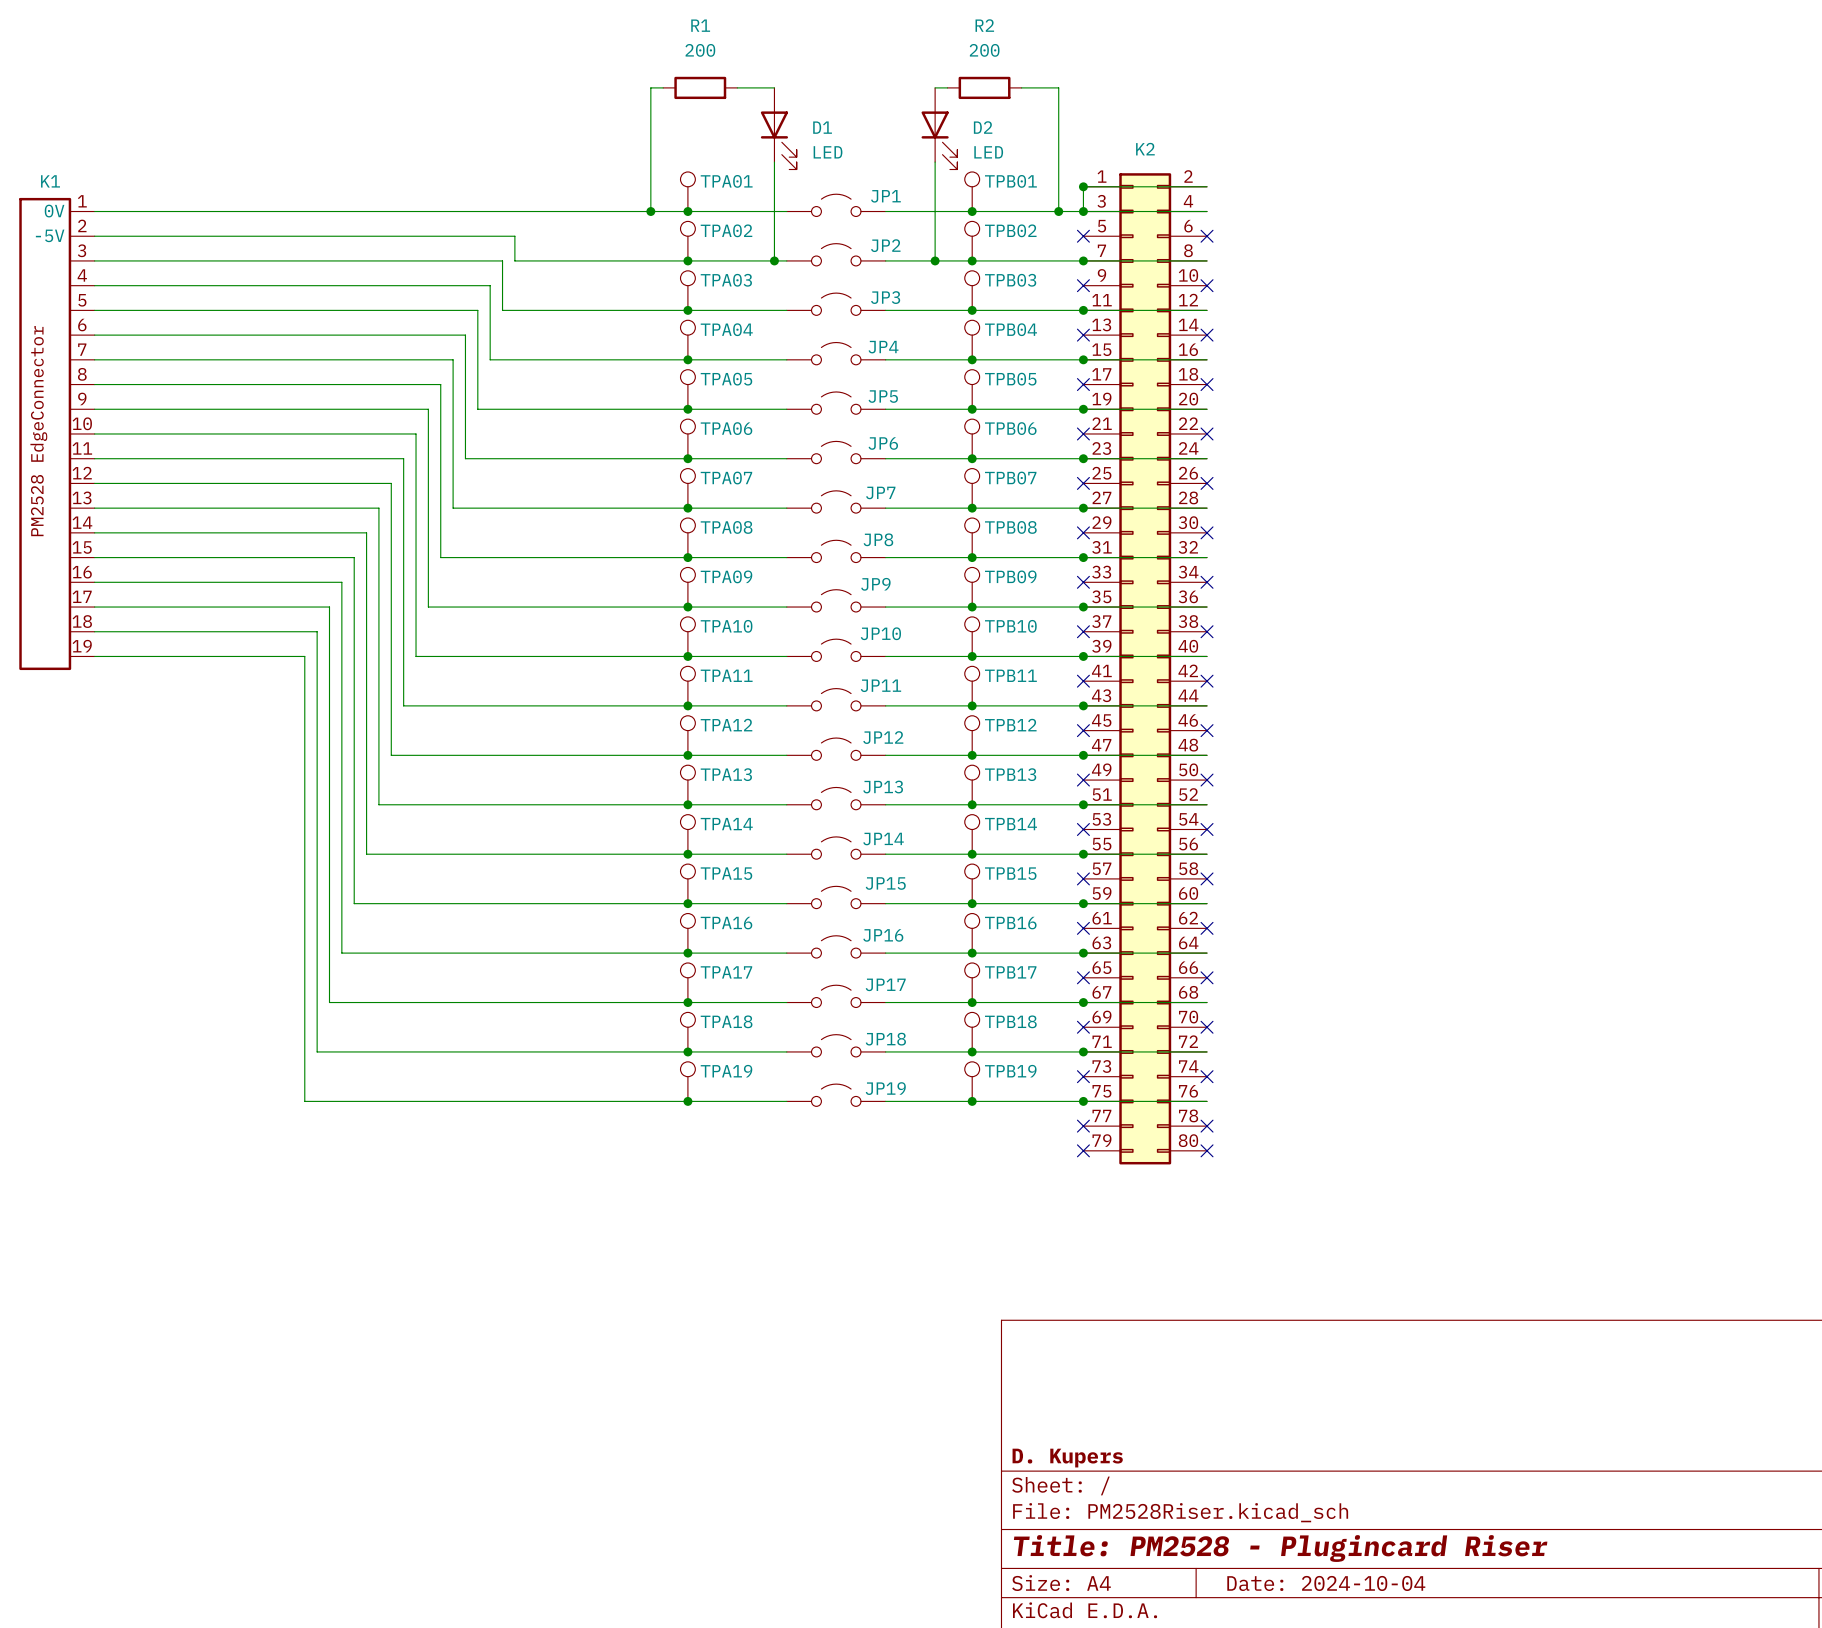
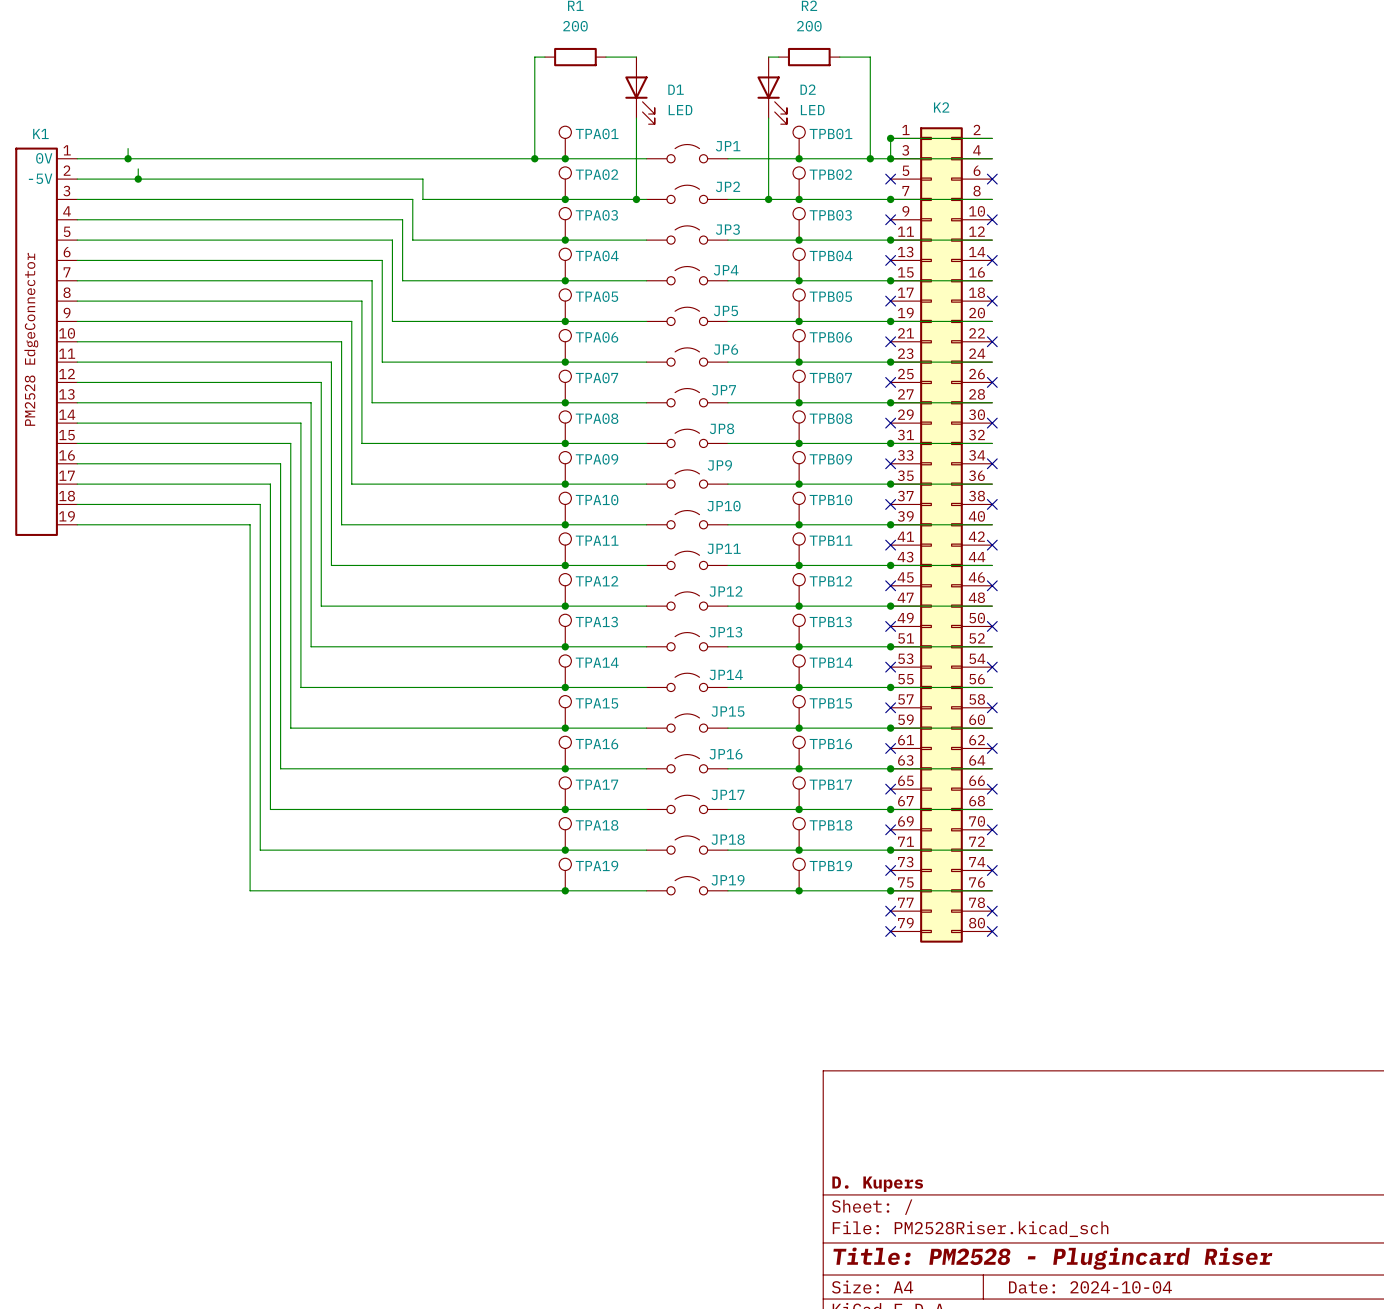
wire: none -> (128, 148) (128, 158)
junction: none -> (128, 158)
wire: none -> (138, 168) (138, 179)
junction: none -> (138, 179)

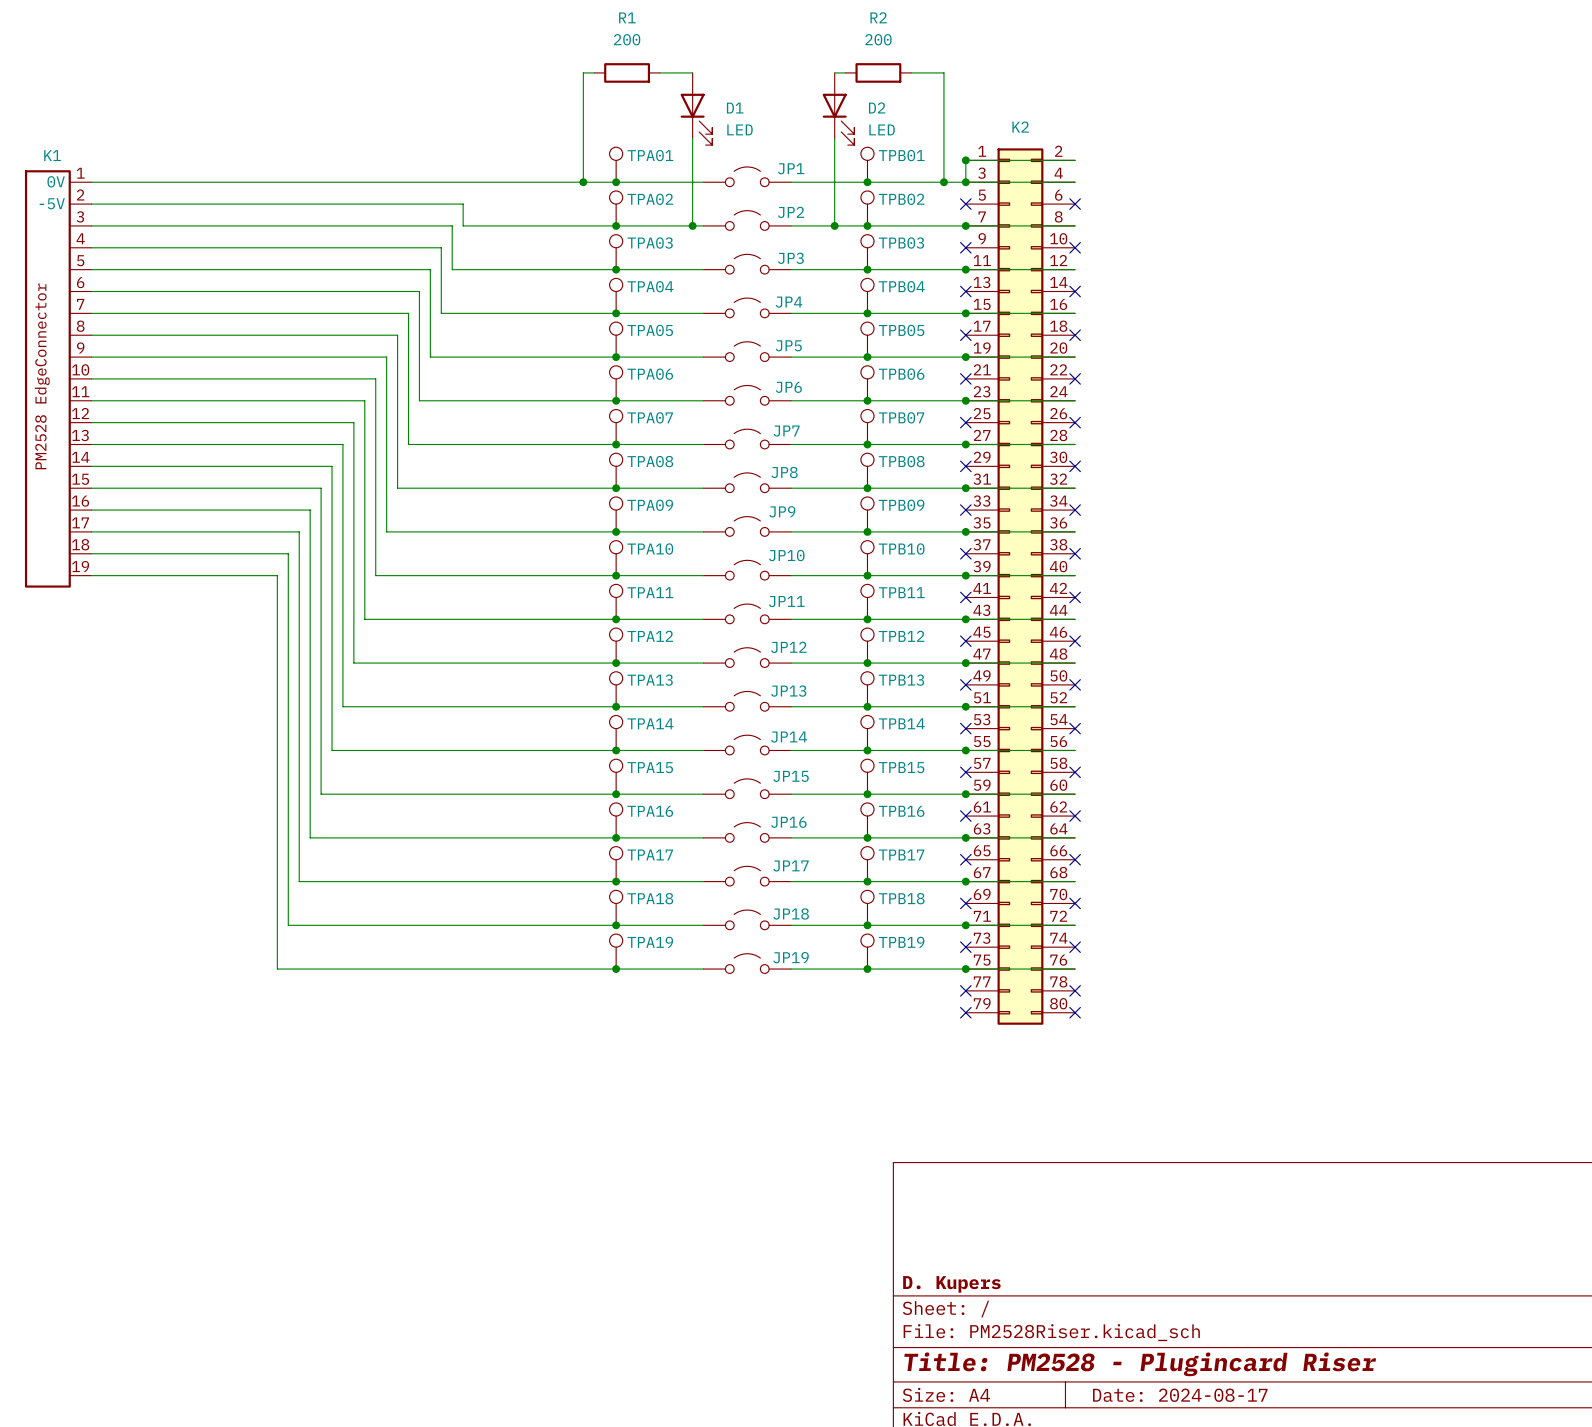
wire: (128, 148) (128, 158) -> none
junction: (128, 158) -> none
wire: (138, 168) (138, 179) -> none
junction: (138, 179) -> none
title block: Date: 2024-10-04 (1090, 1287) -> Date: 2024-08-17 (1180, 1395)

